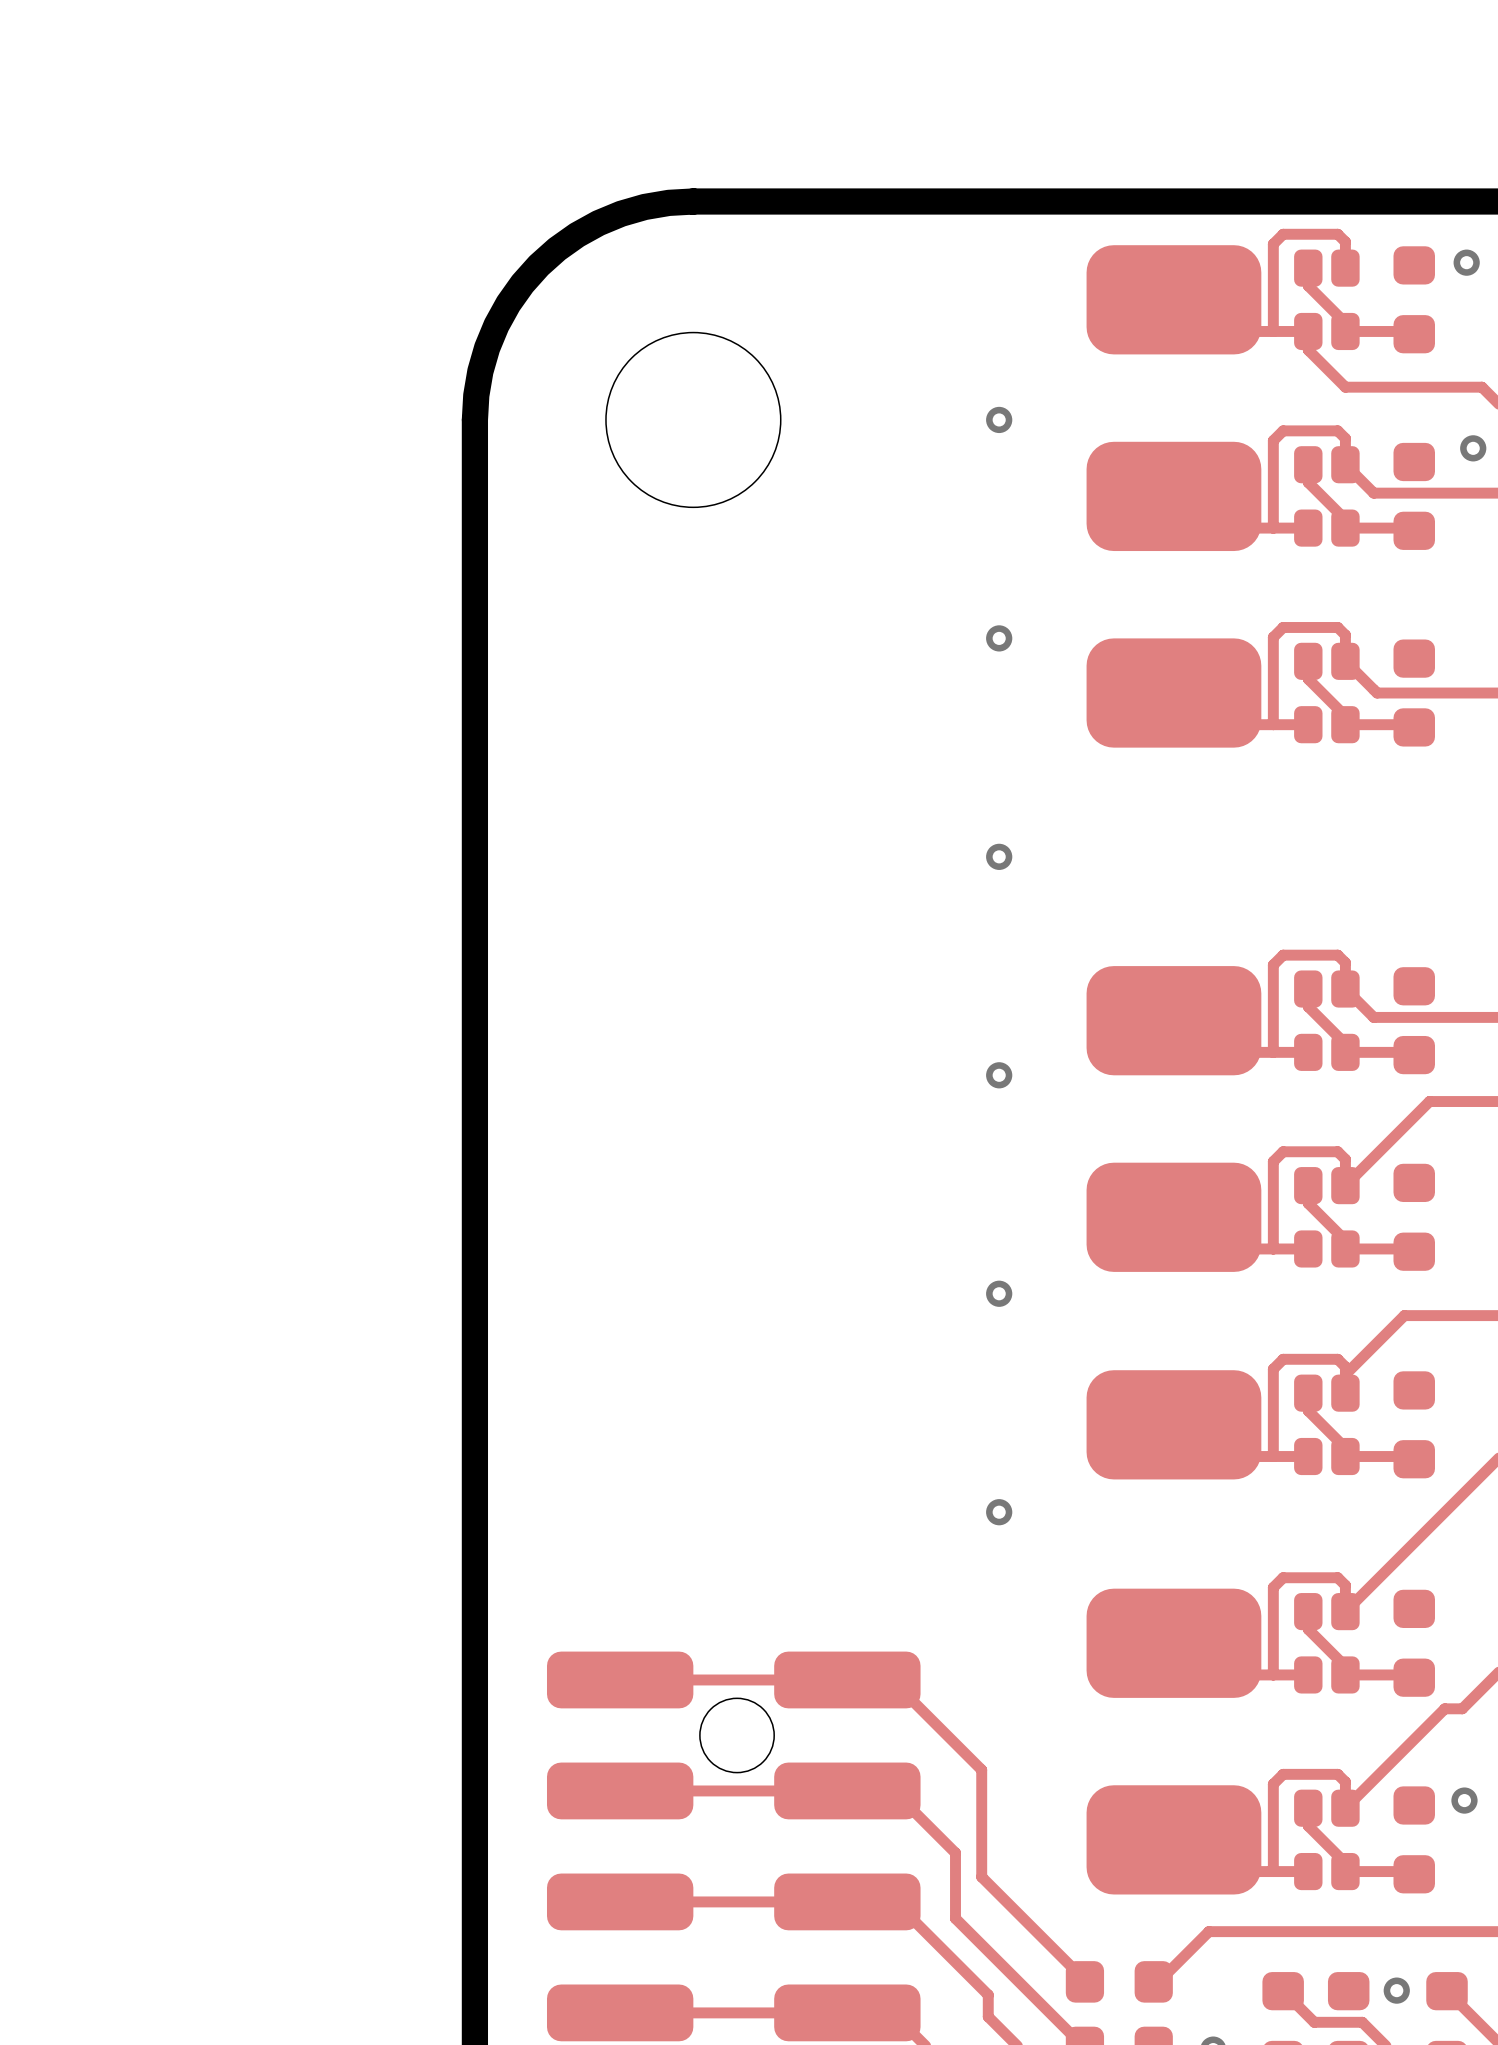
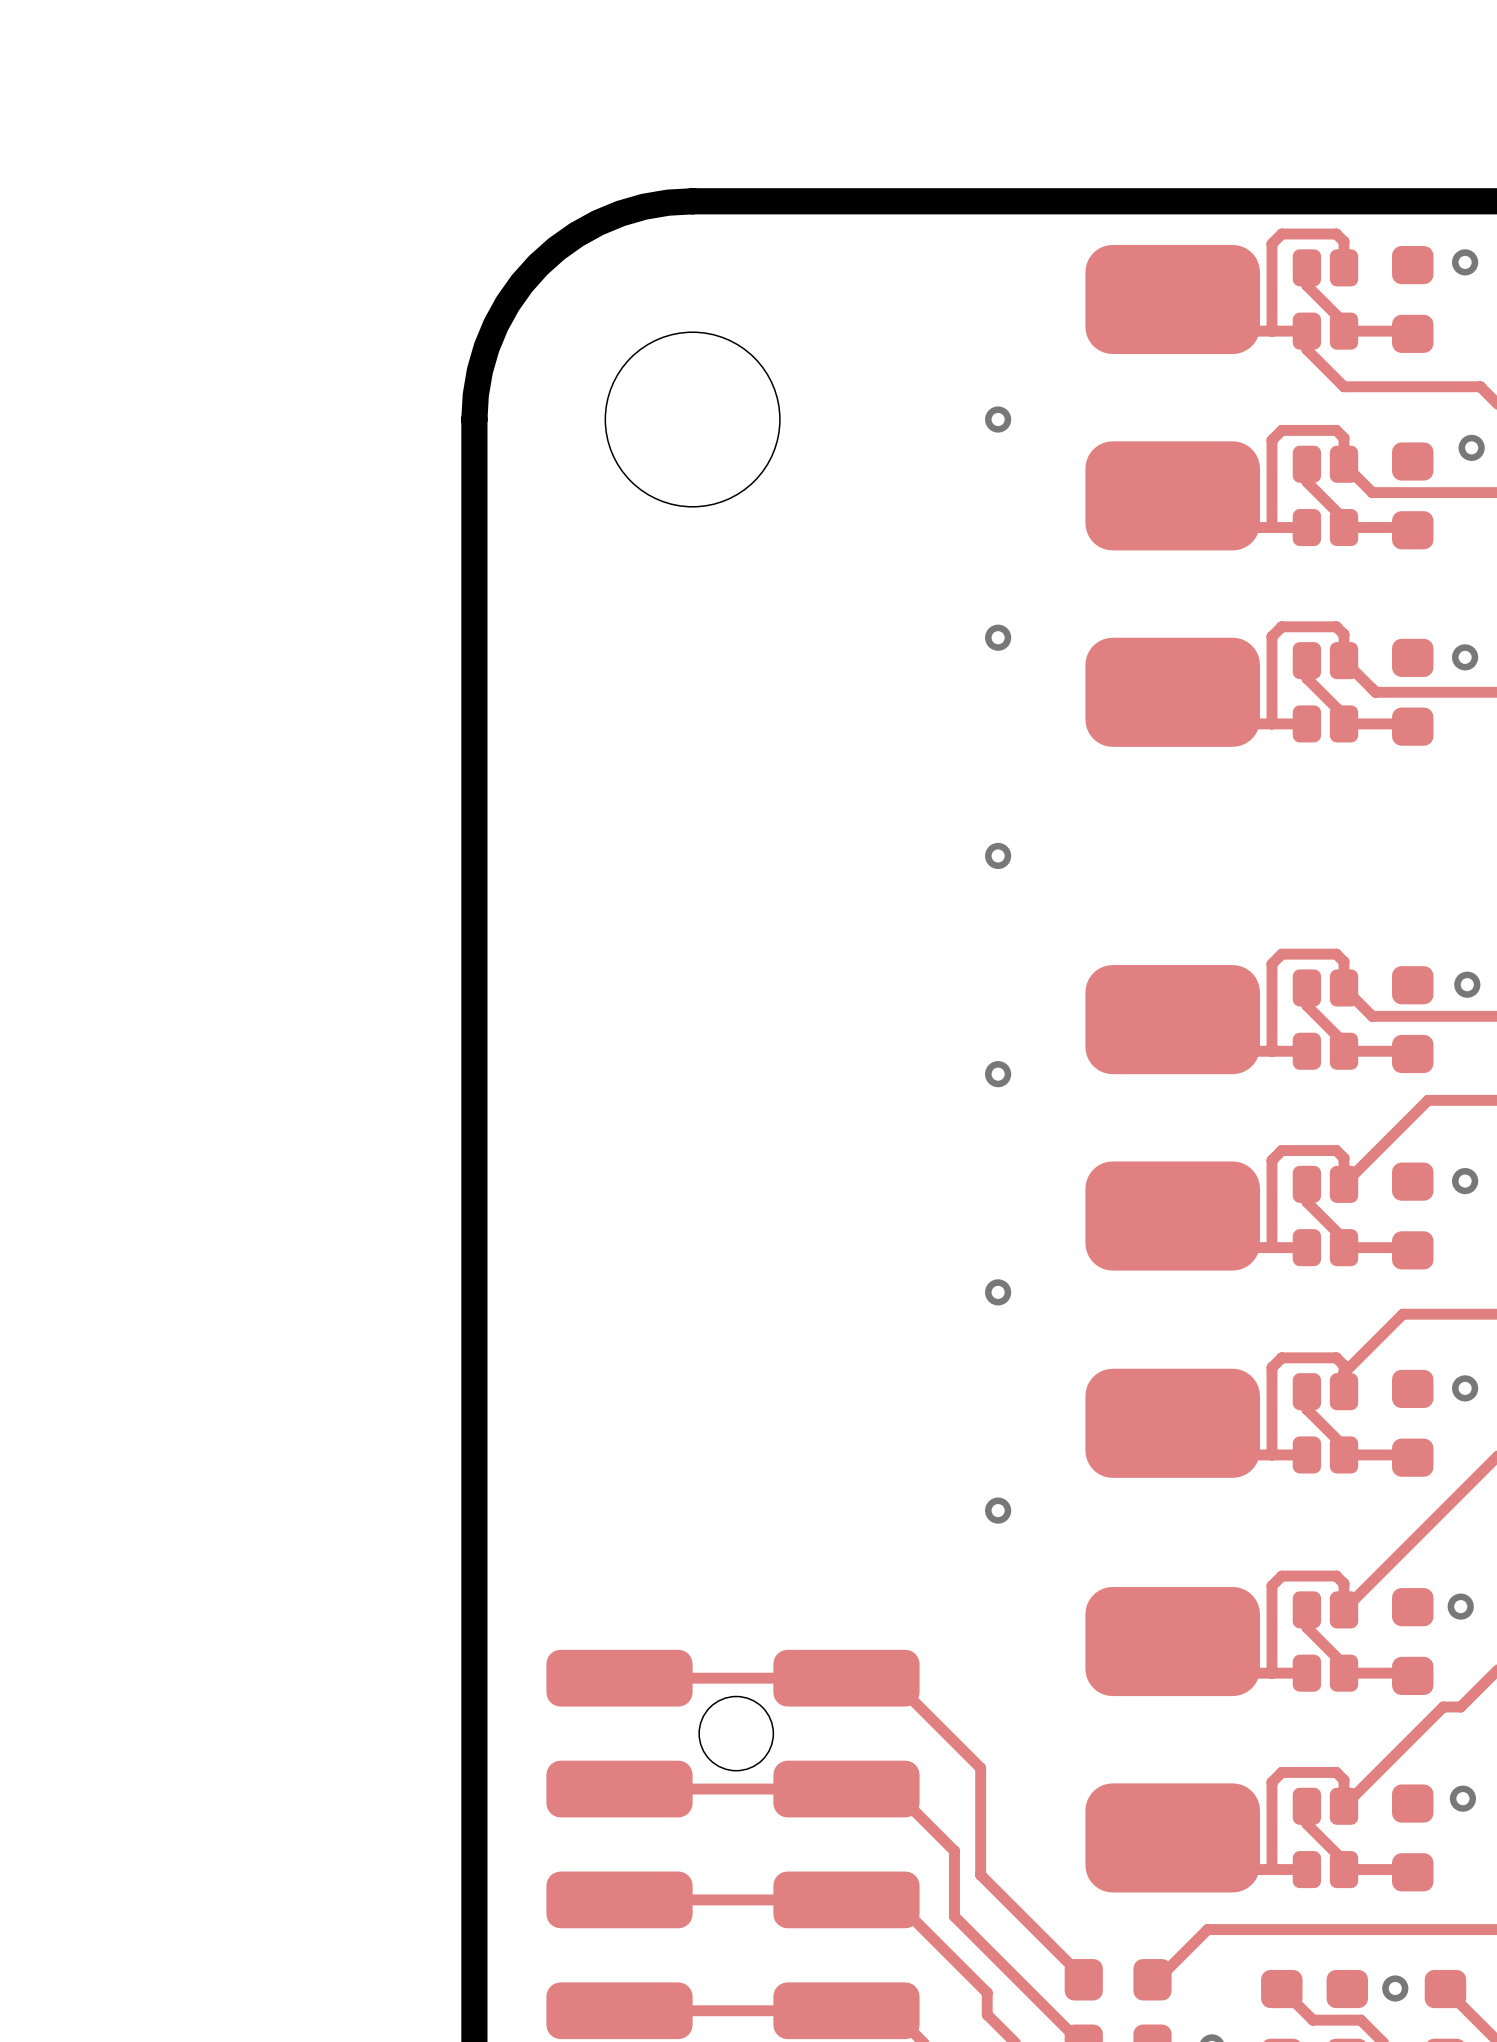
via: none -> (1465, 657)
via: none -> (1467, 984)
via: none -> (1465, 1181)
via: none -> (1465, 1388)
via: none -> (1460, 1606)

